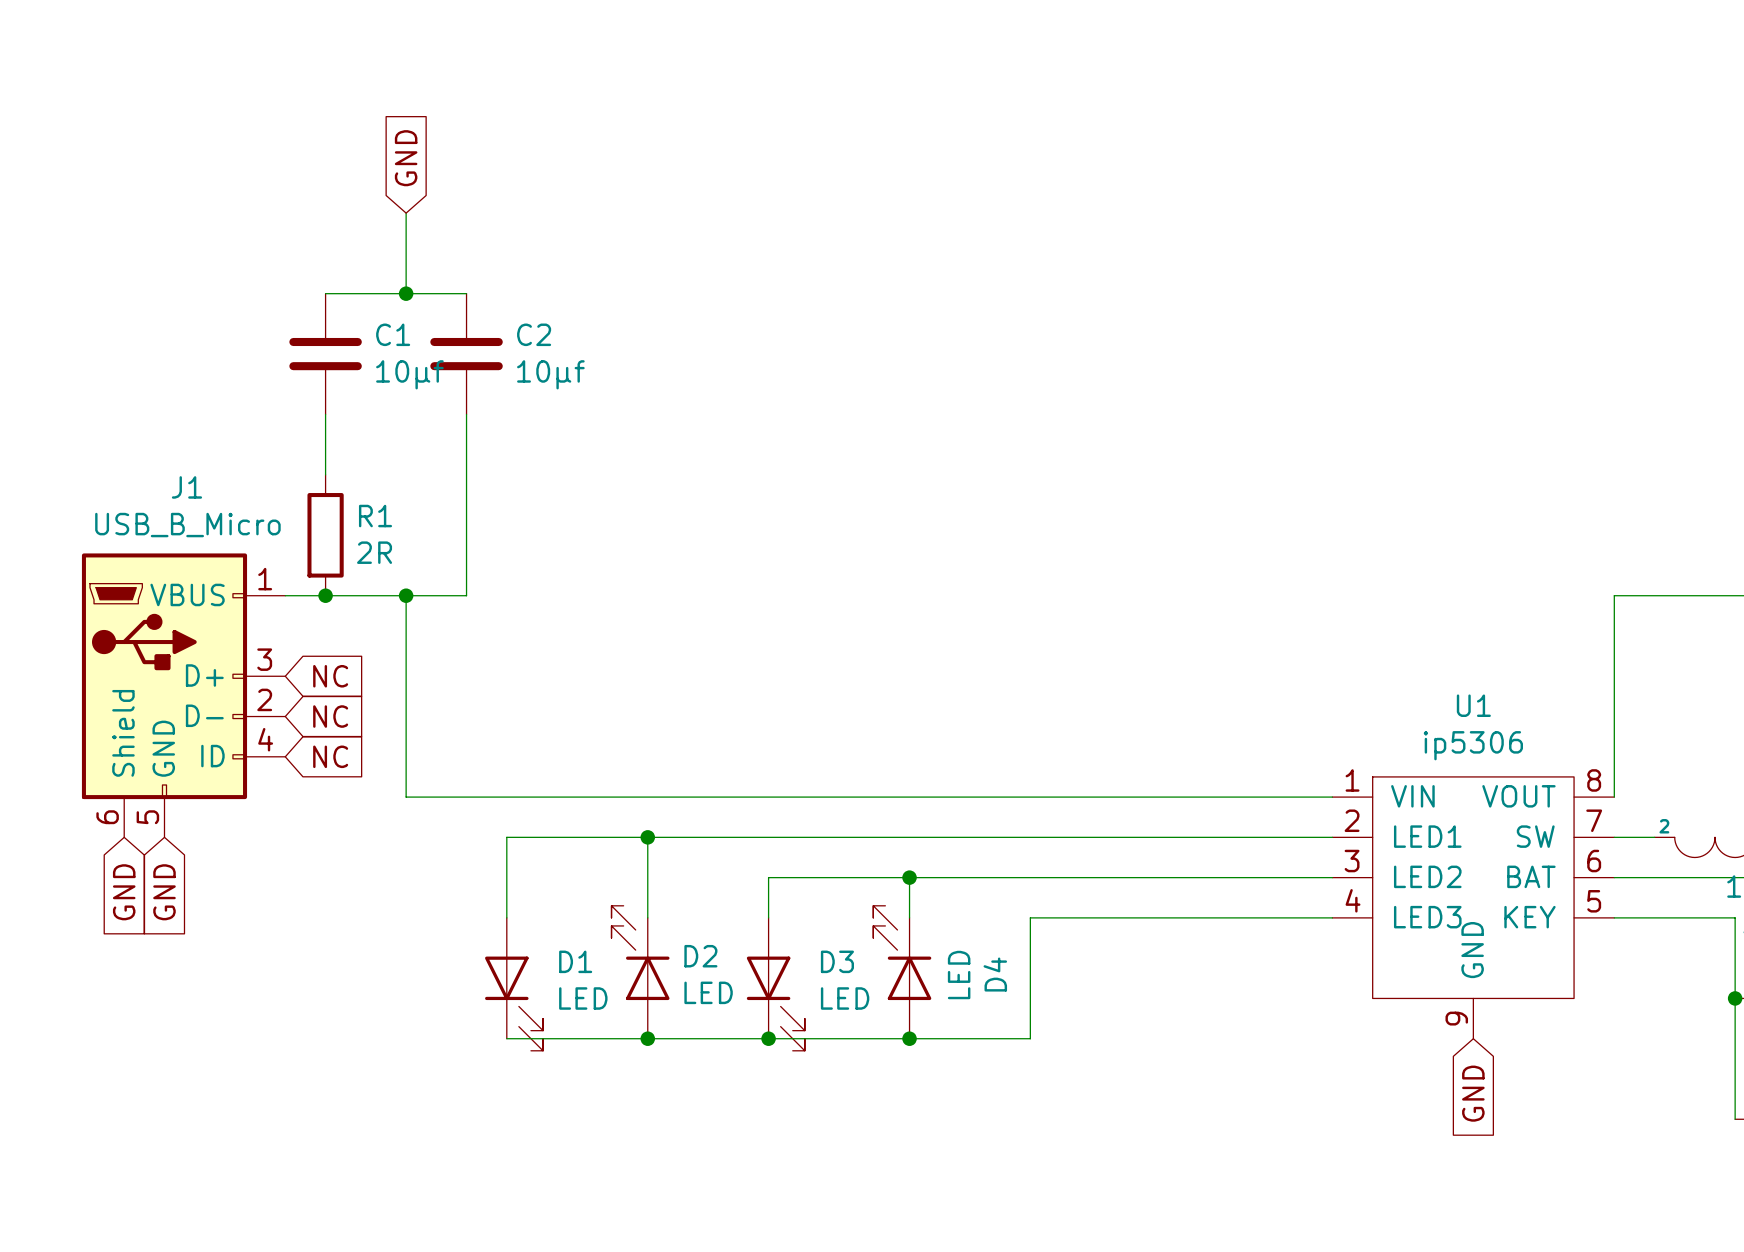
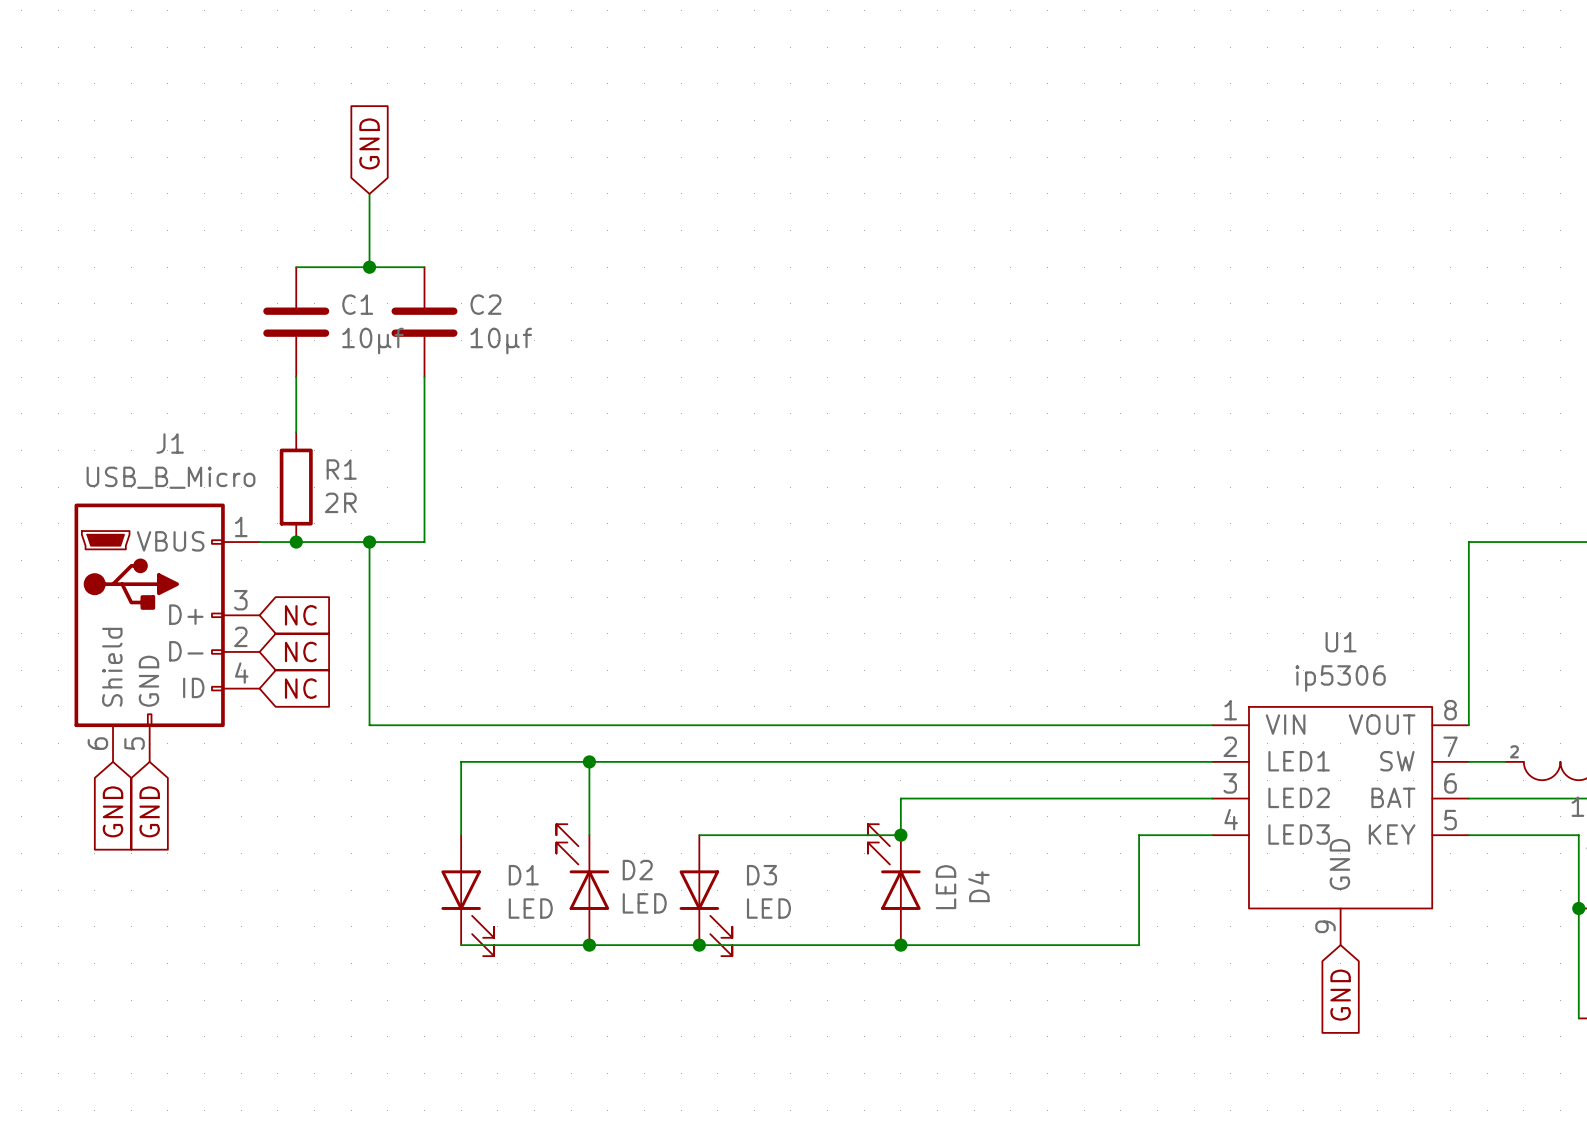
wire: (909, 877) (909, 917) -> none
junction: (909, 877) -> none
wire: (990, 877) (768, 877) (768, 917) -> (900, 798) (900, 835) (699, 835)
junction: none -> (900, 835)
wire: (1251, 917) (1030, 917) (1030, 1038) -> (1139, 835) (1139, 945) (937, 945)
D4 position: (902, 972) -> (894, 884)
junction: (909, 1038) -> none
junction: none -> (900, 945)

